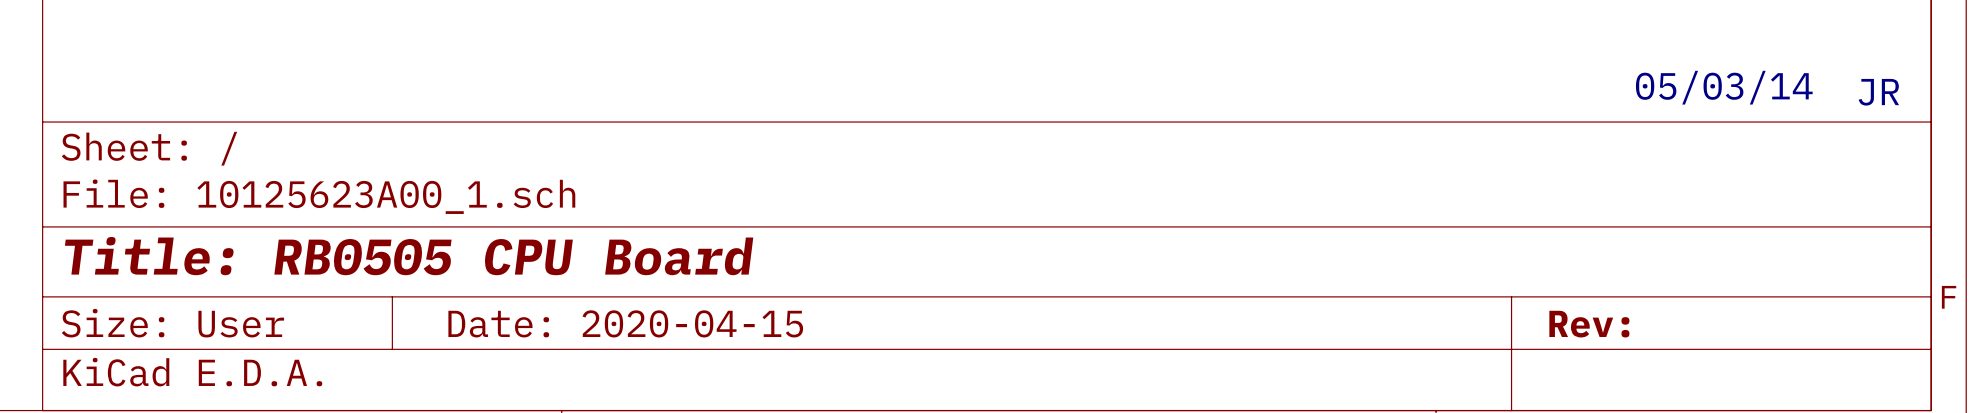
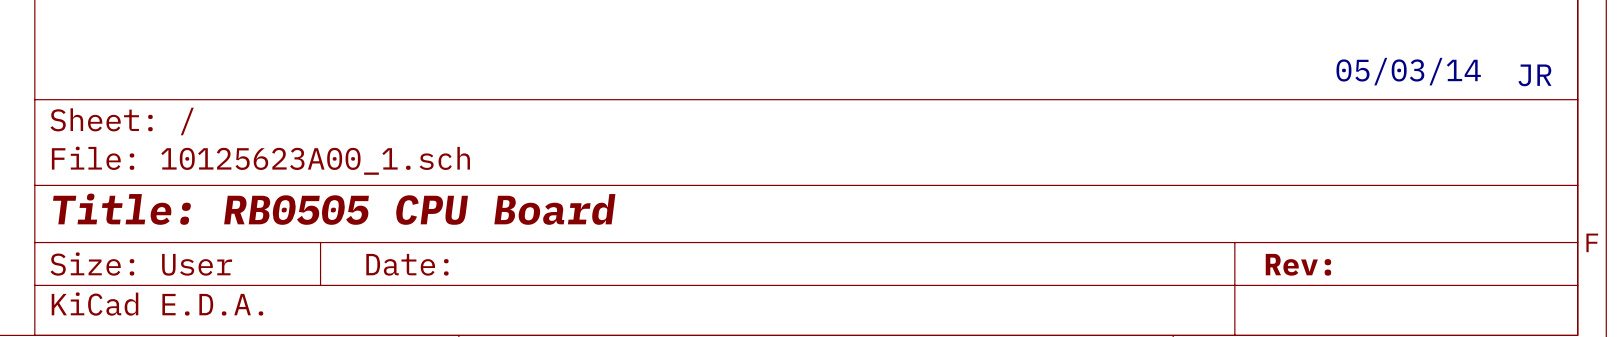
title block: Date: 2020-04-15 (625, 323) -> Date: (407, 264)

